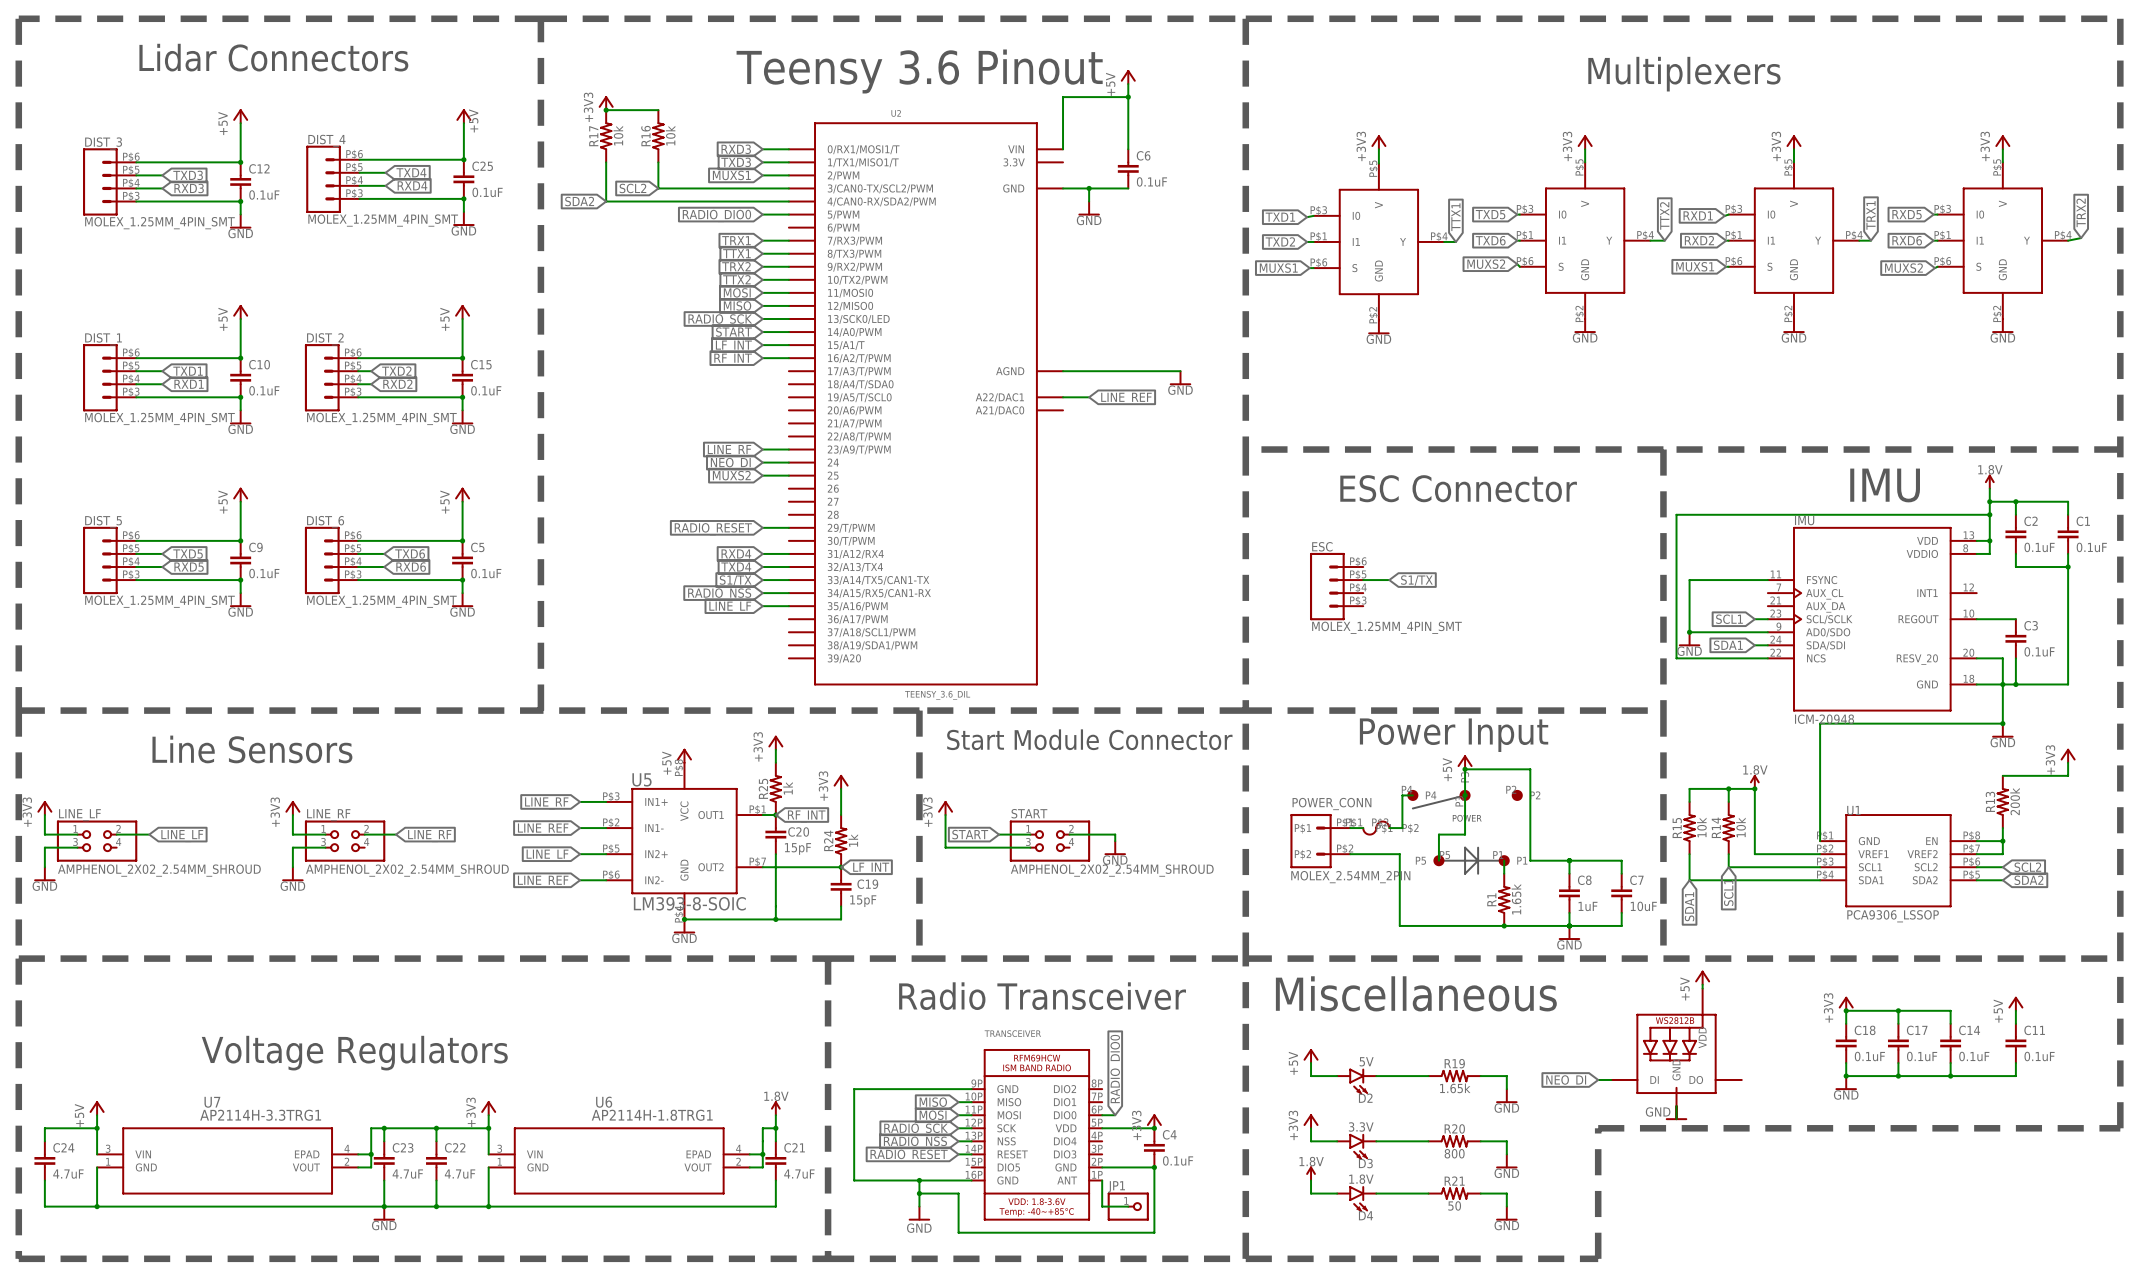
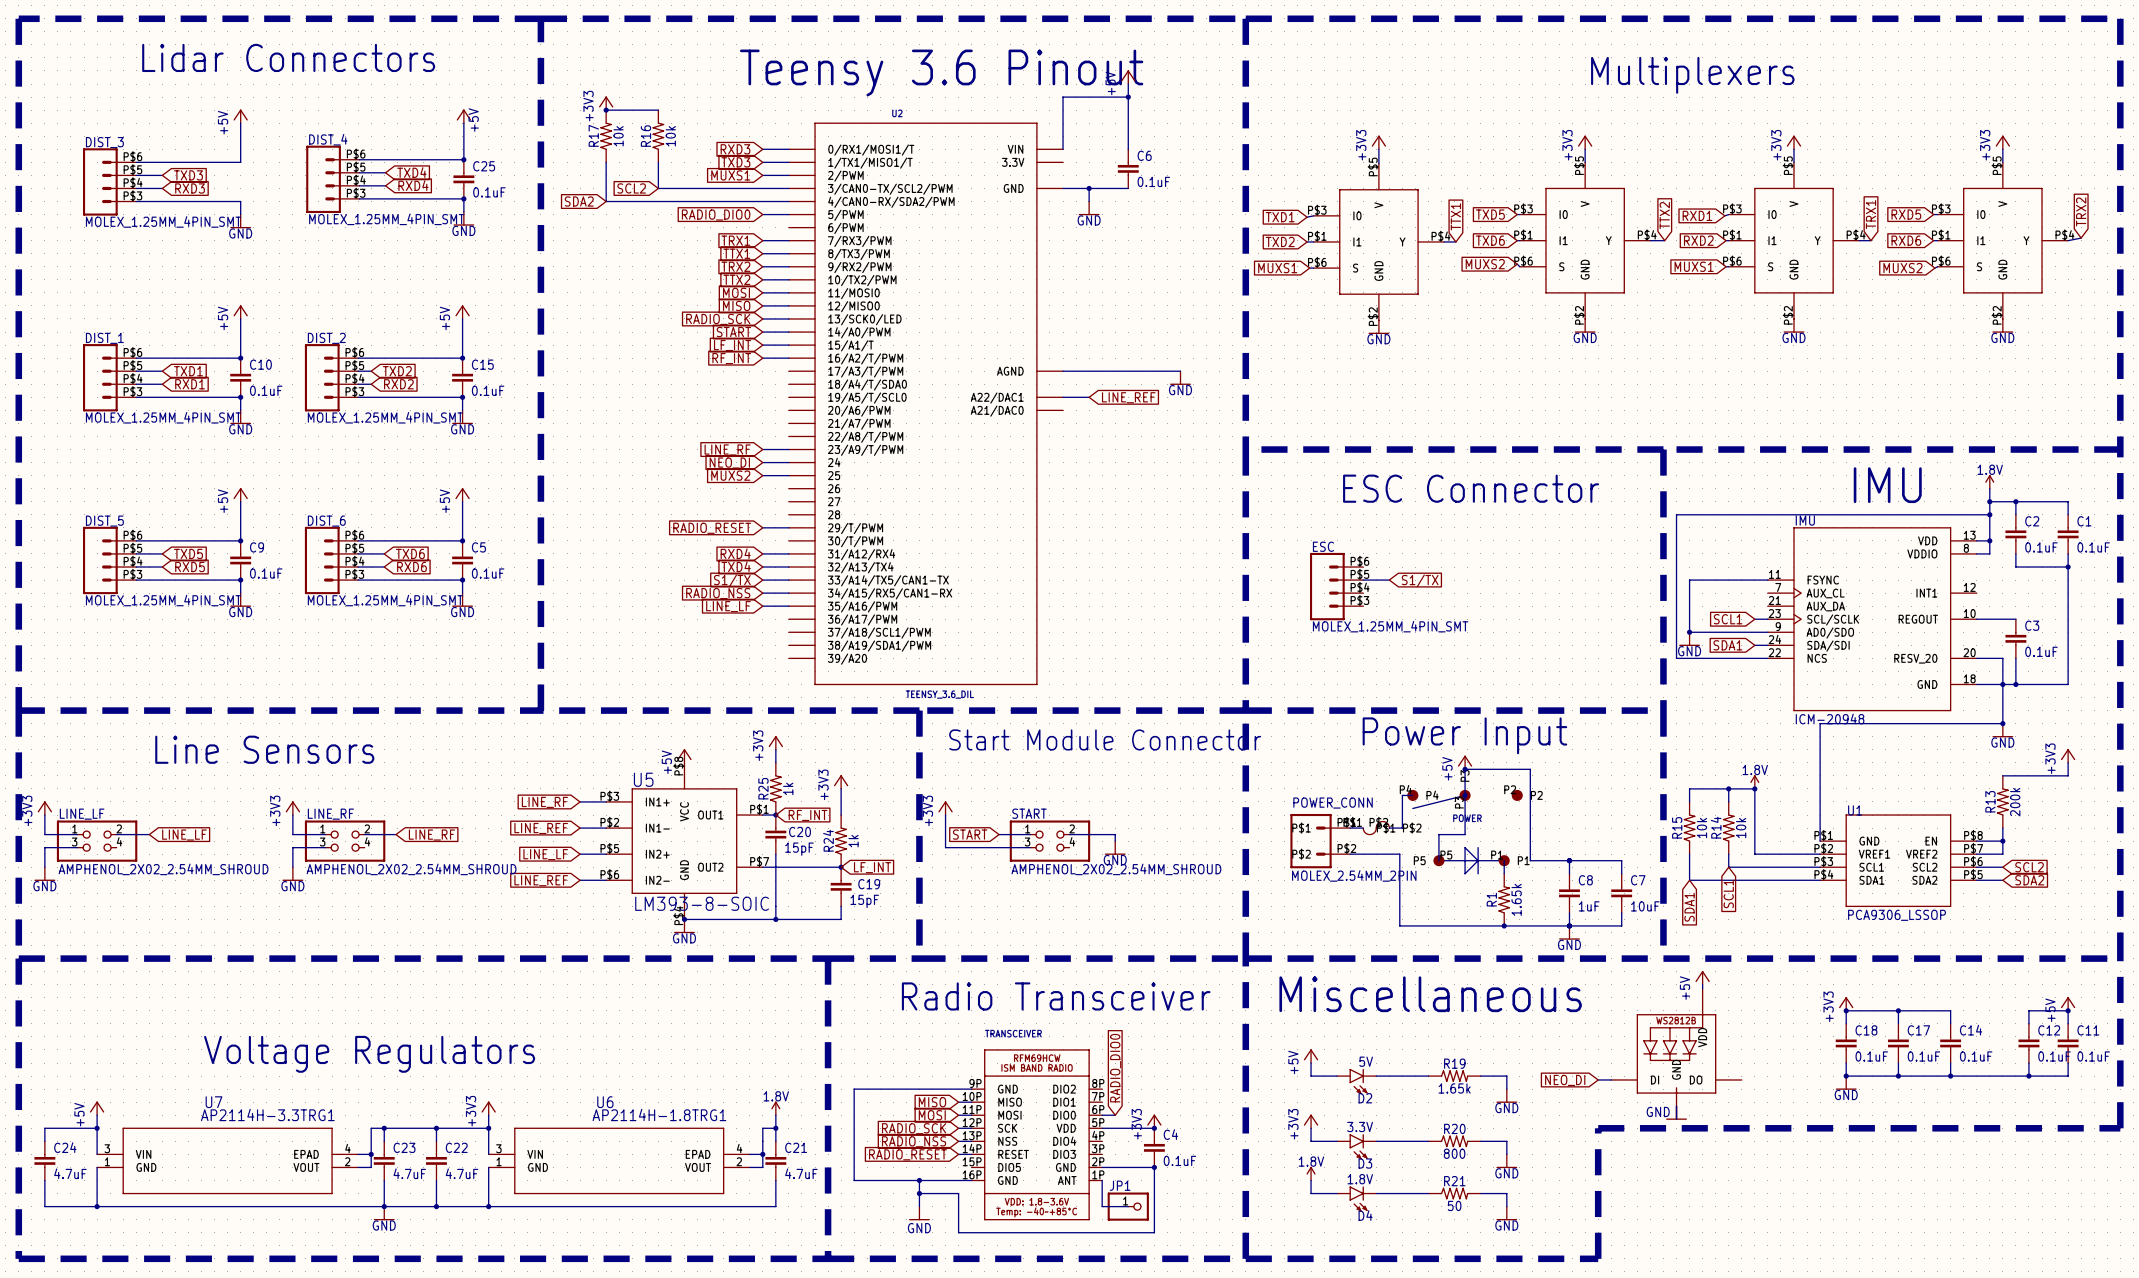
junction: (240, 162) -> none
C12 position: (240, 181) -> (2028, 1043)
junction: (240, 201) -> none
power symbol position: +5V (2015, 1003) -> +5V (2068, 1003)
wire: (2015, 1010) (2015, 1023) -> (2028, 1063) (2028, 1076)
junction: none -> (2068, 1010)
wire: none -> (2028, 1023) (2028, 1010) (2068, 1010) (2068, 1023)
C11 position: (2015, 1043) -> (2068, 1043)
wire: (2015, 1063) (2015, 1076) -> (2068, 1063) (2068, 1076) (2015, 1076)
junction: none -> (2028, 1076)

